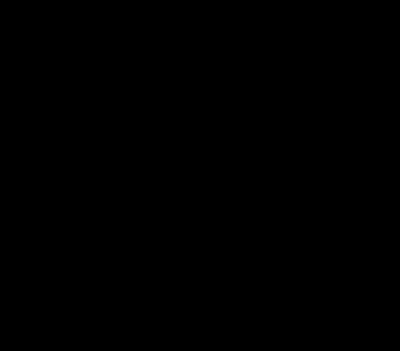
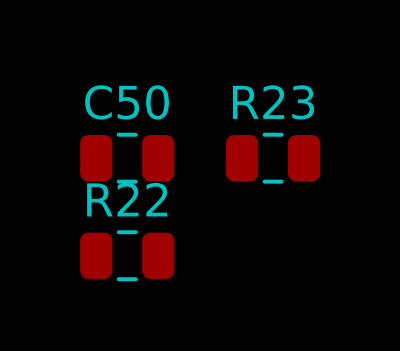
C50: none -> (127, 158)
R23: none -> (273, 158)
R22: none -> (127, 255)

